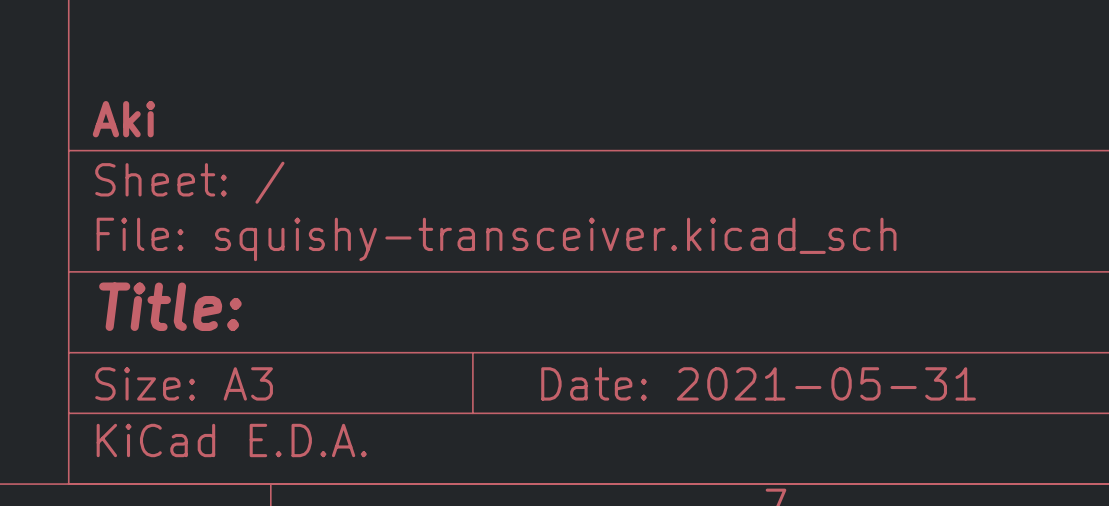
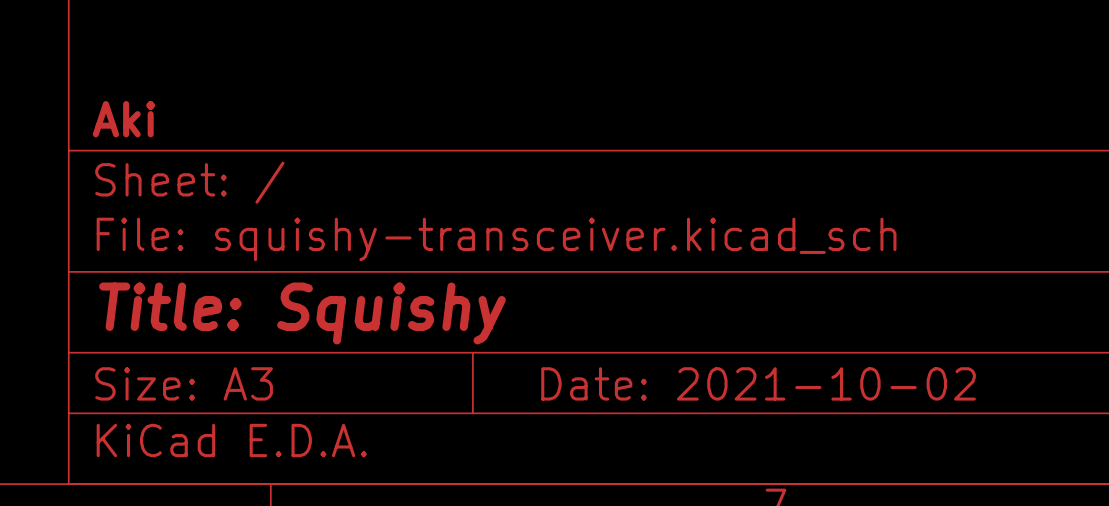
title block: Title: (170, 306) -> Title: Squishy (302, 313)
title block: Date: 2021-05-31 (758, 383) -> Date: 2021-10-02 (758, 383)

